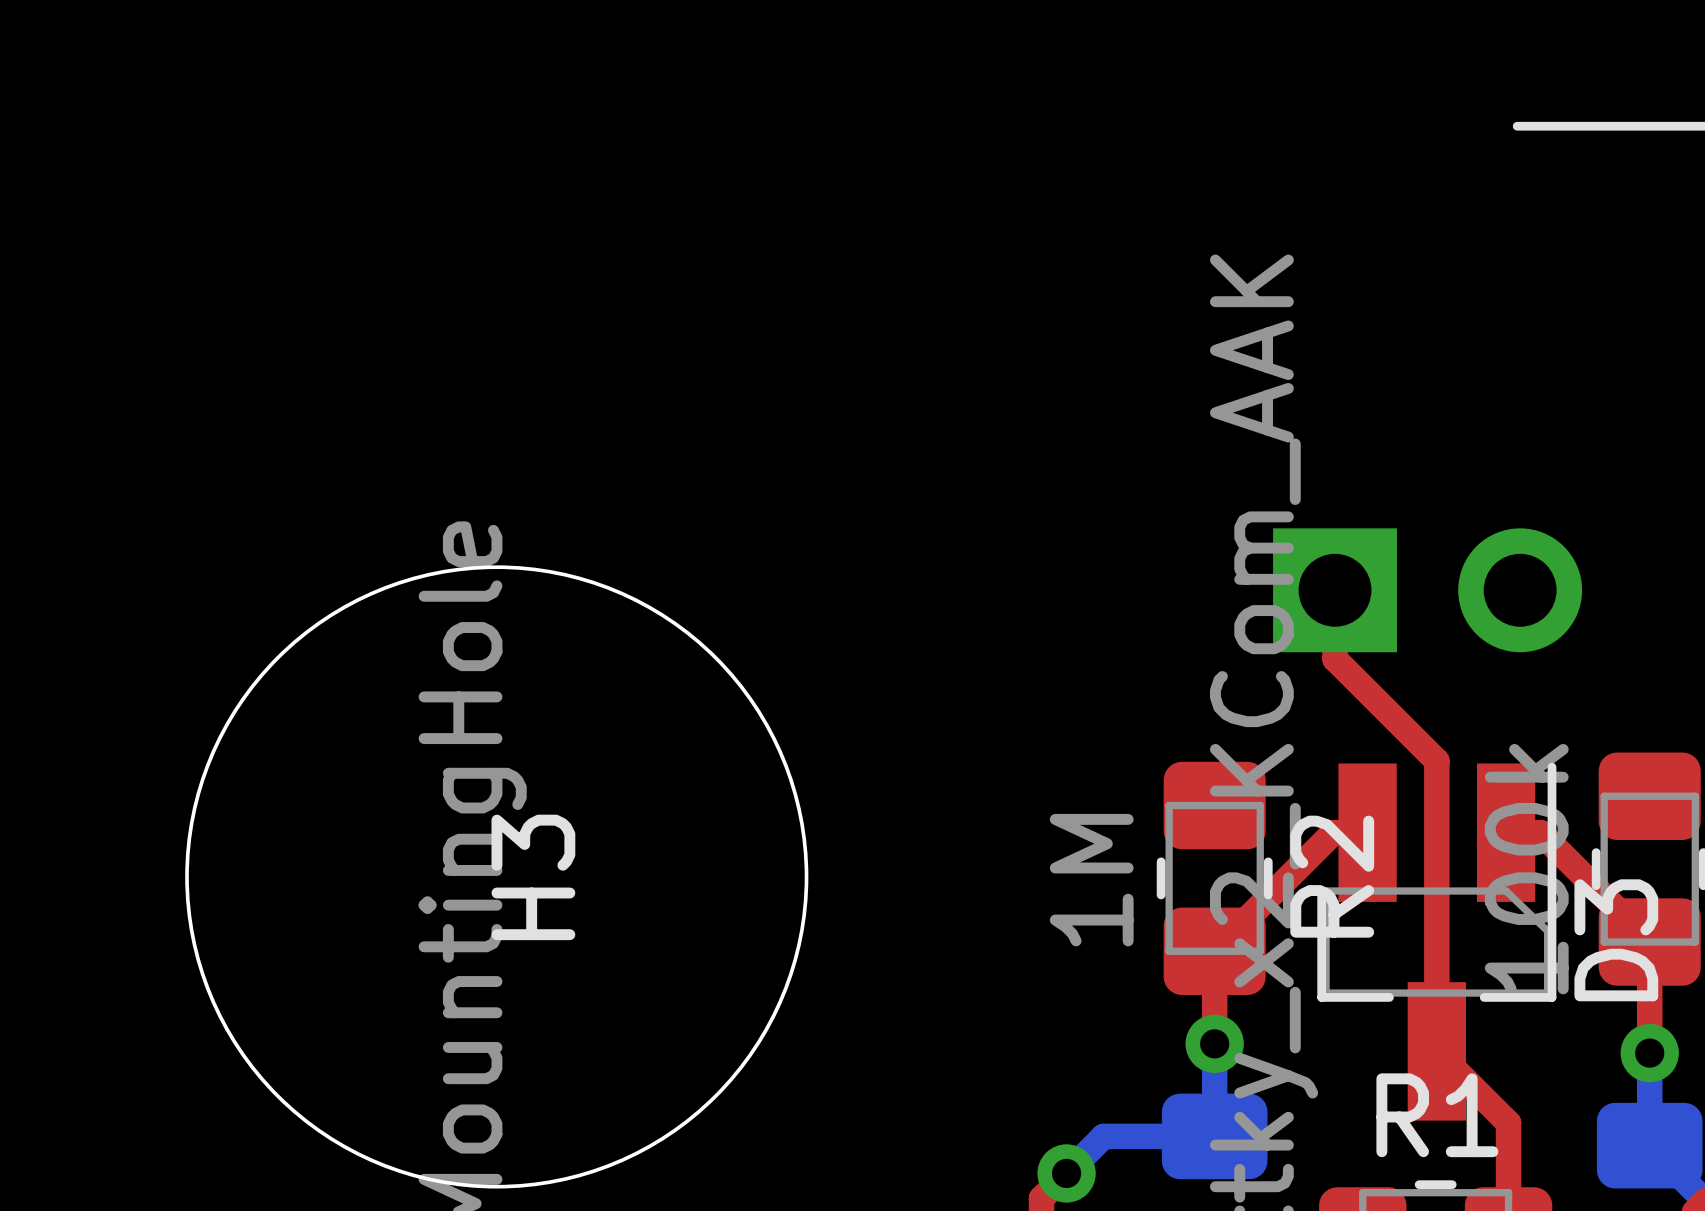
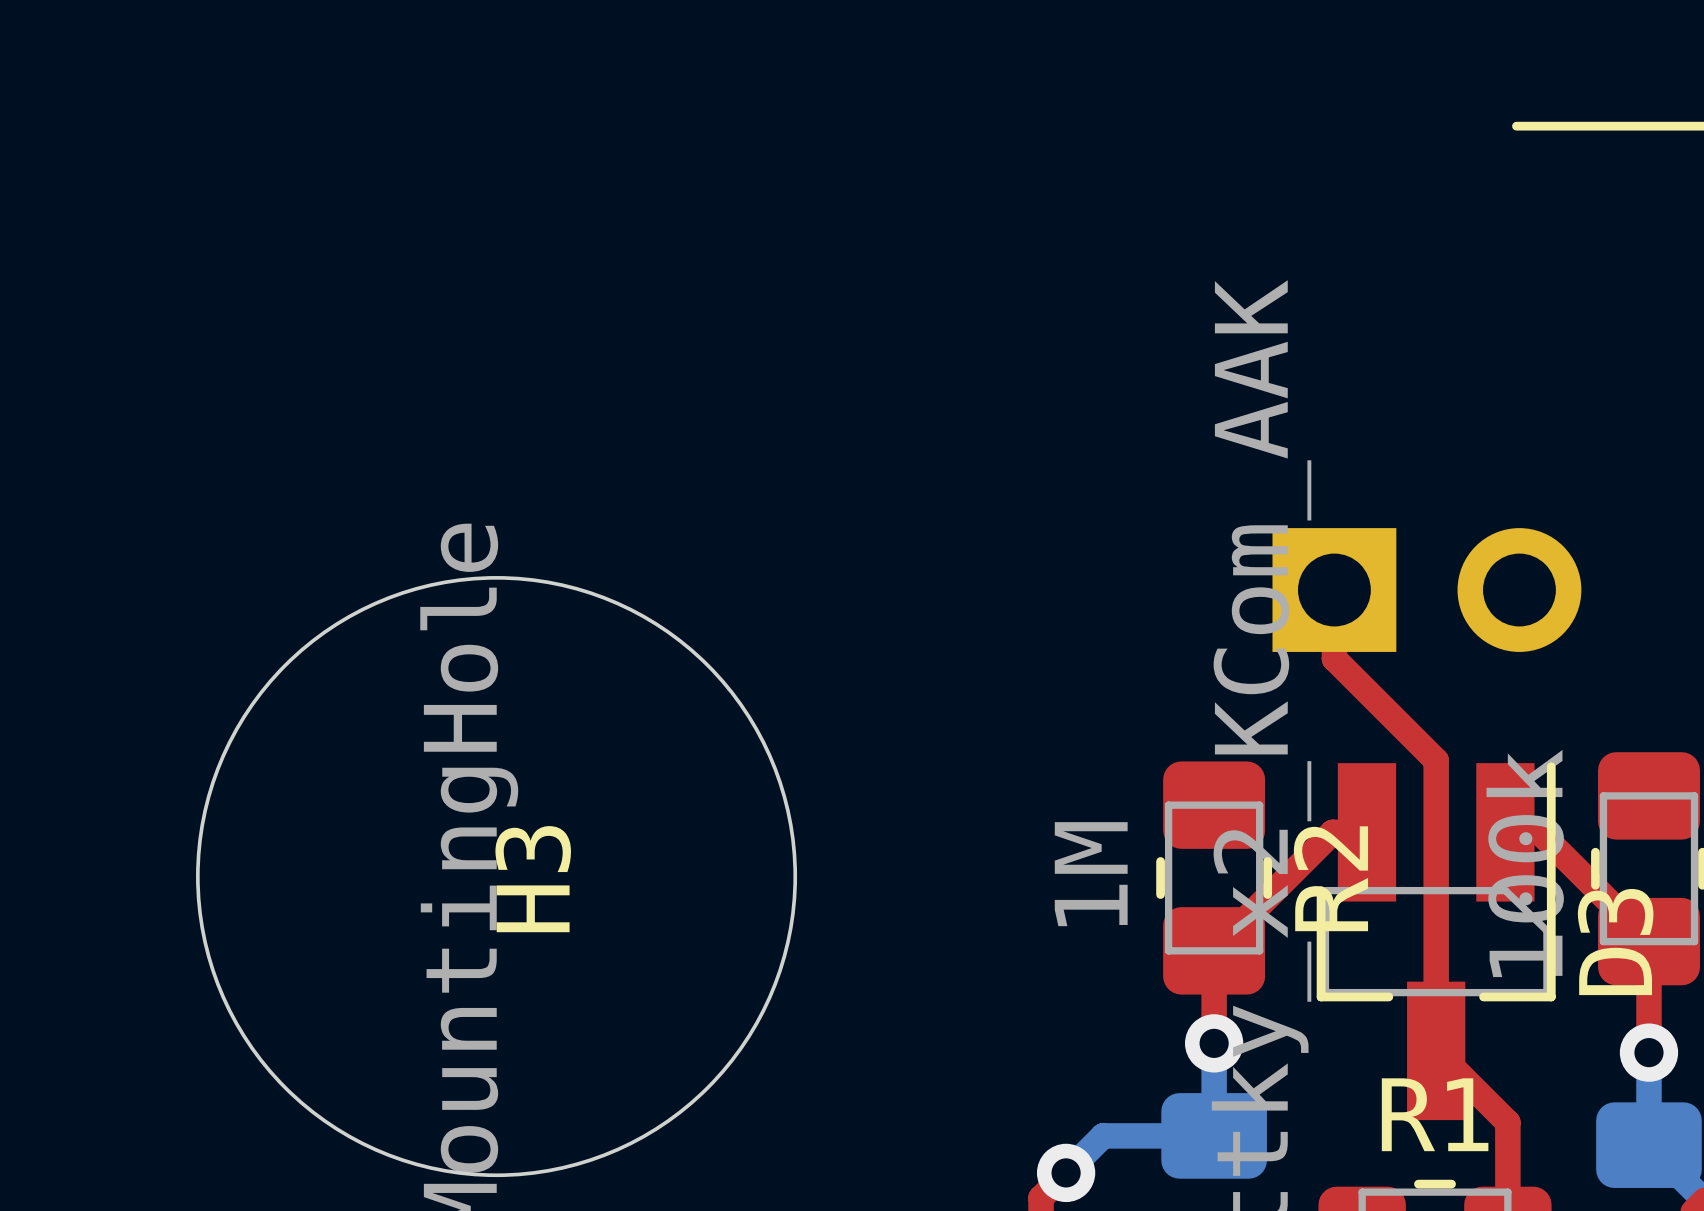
round board edge size: [185, 565, 809, 1189] -> [196, 576, 798, 1178]

